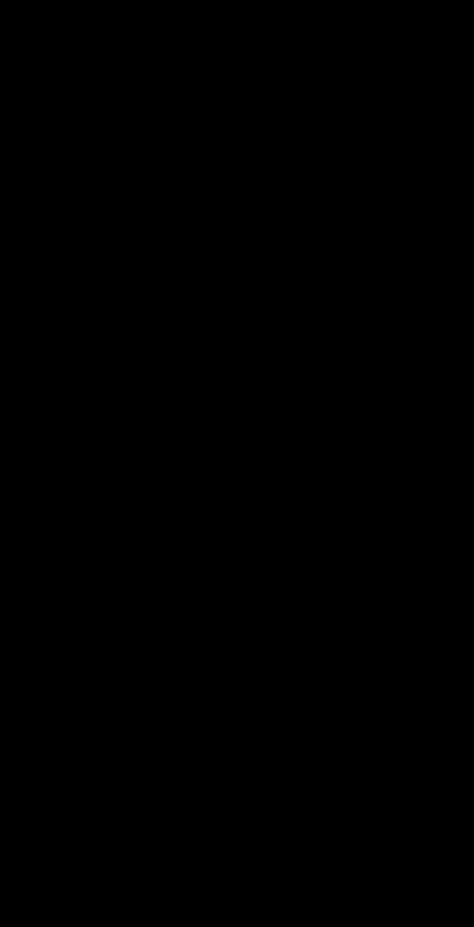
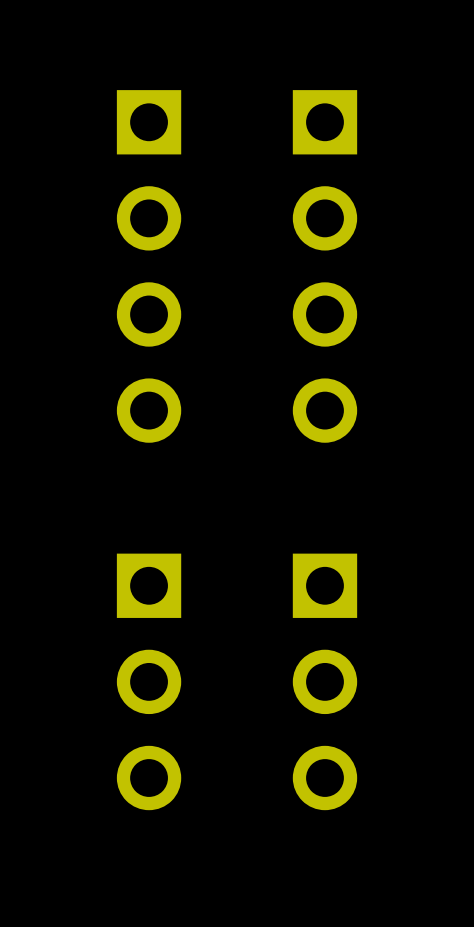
part: none -> (149, 266)
part: none -> (324, 266)
part: none -> (149, 681)
part: none -> (324, 681)

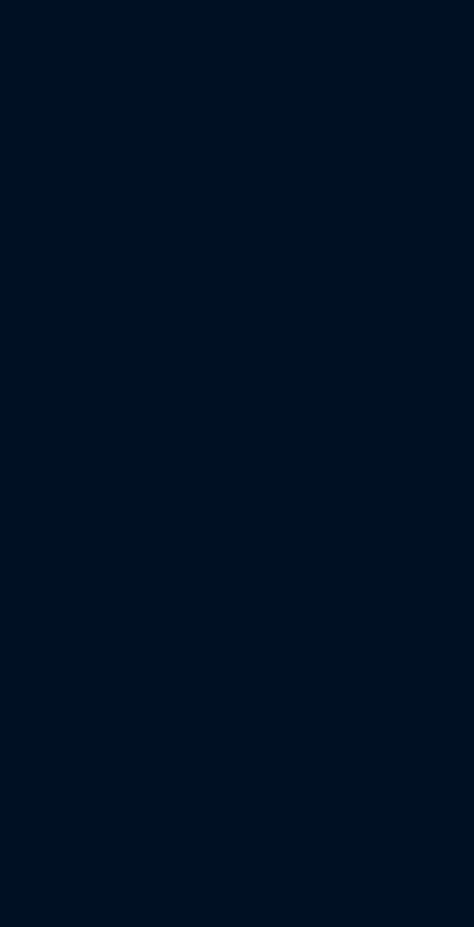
part: (149, 266) -> none
part: (324, 266) -> none
part: (149, 681) -> none
part: (324, 681) -> none

